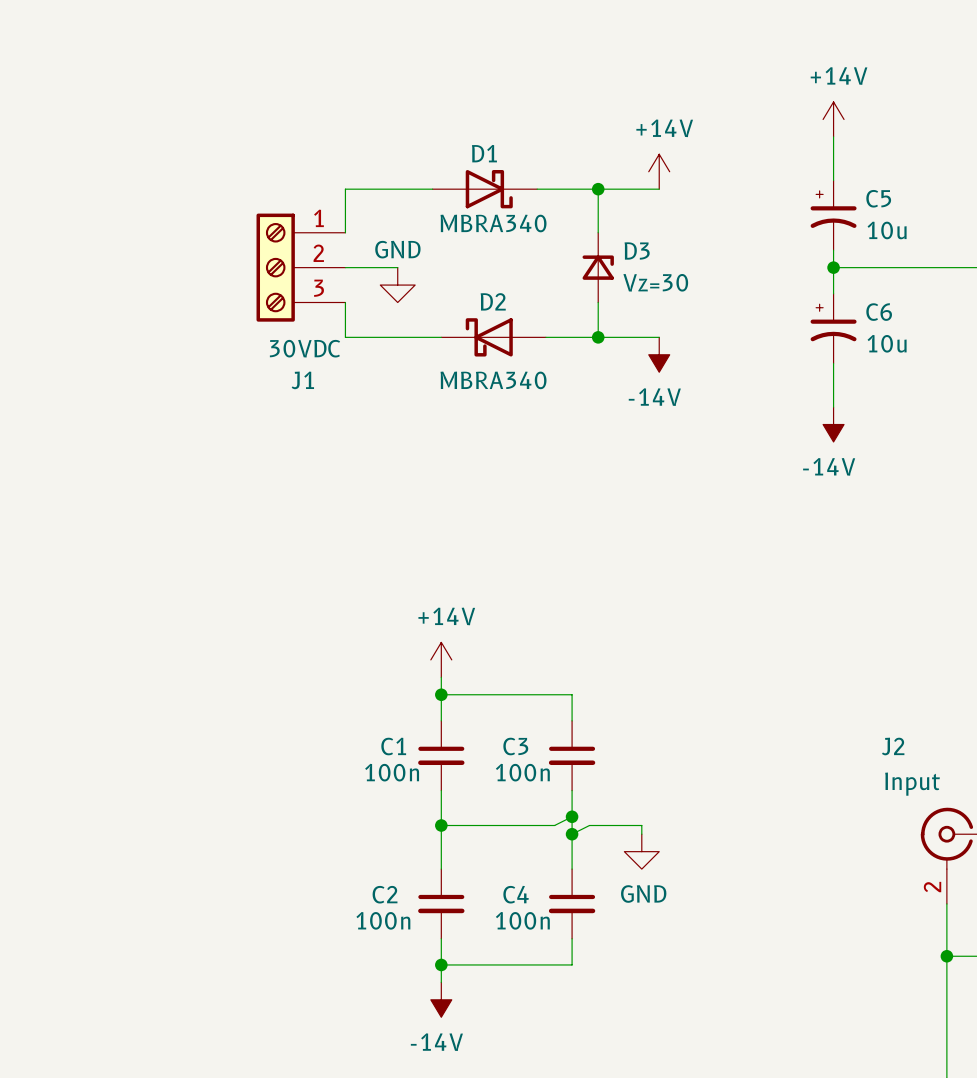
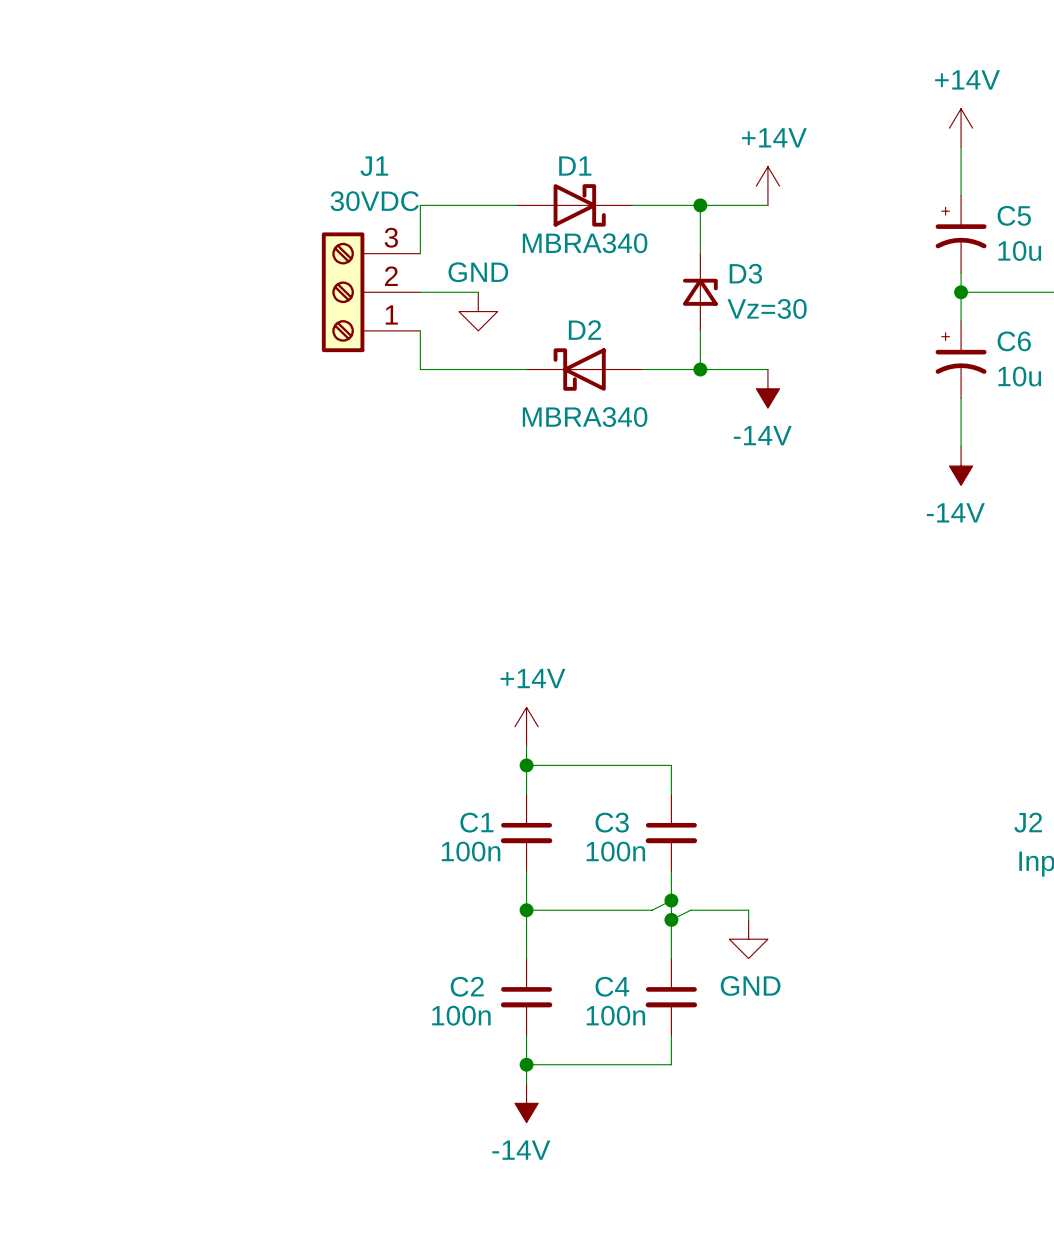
J1 flip: as is (275, 267) -> up-down (343, 292)

